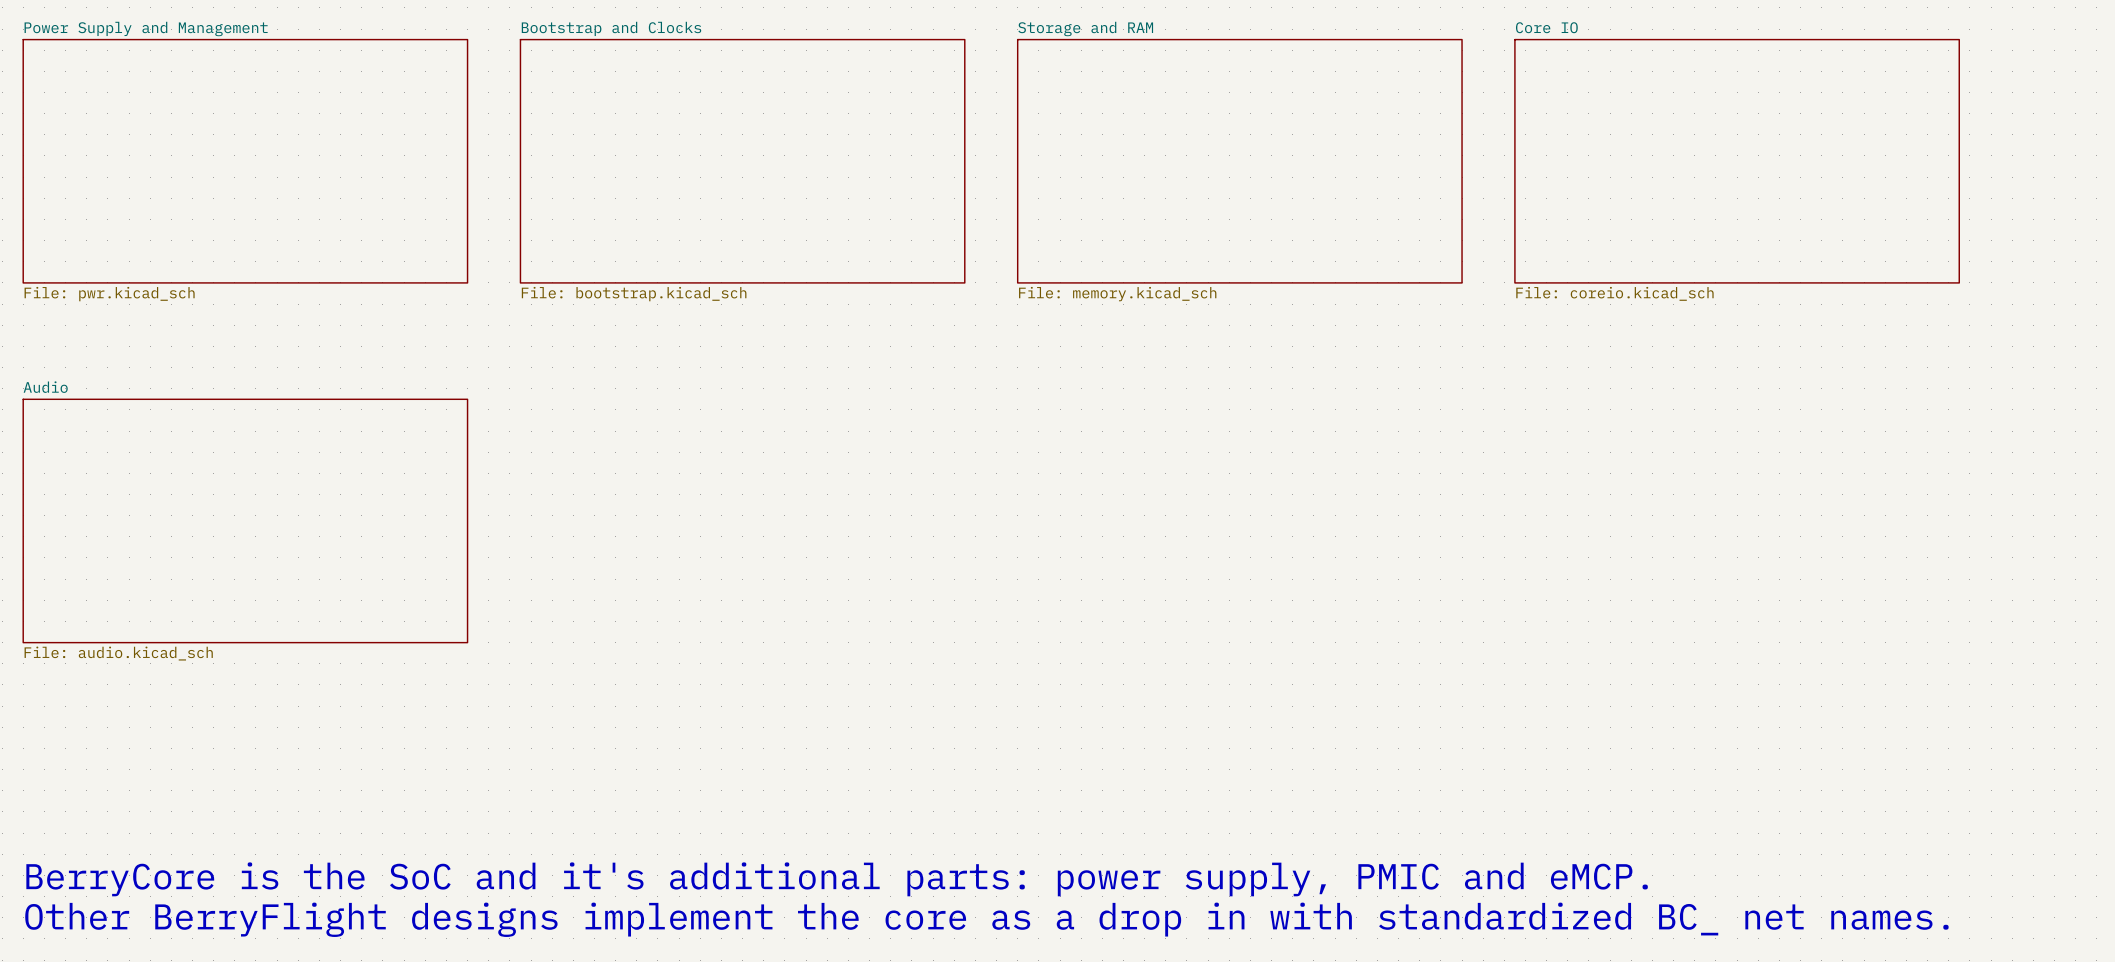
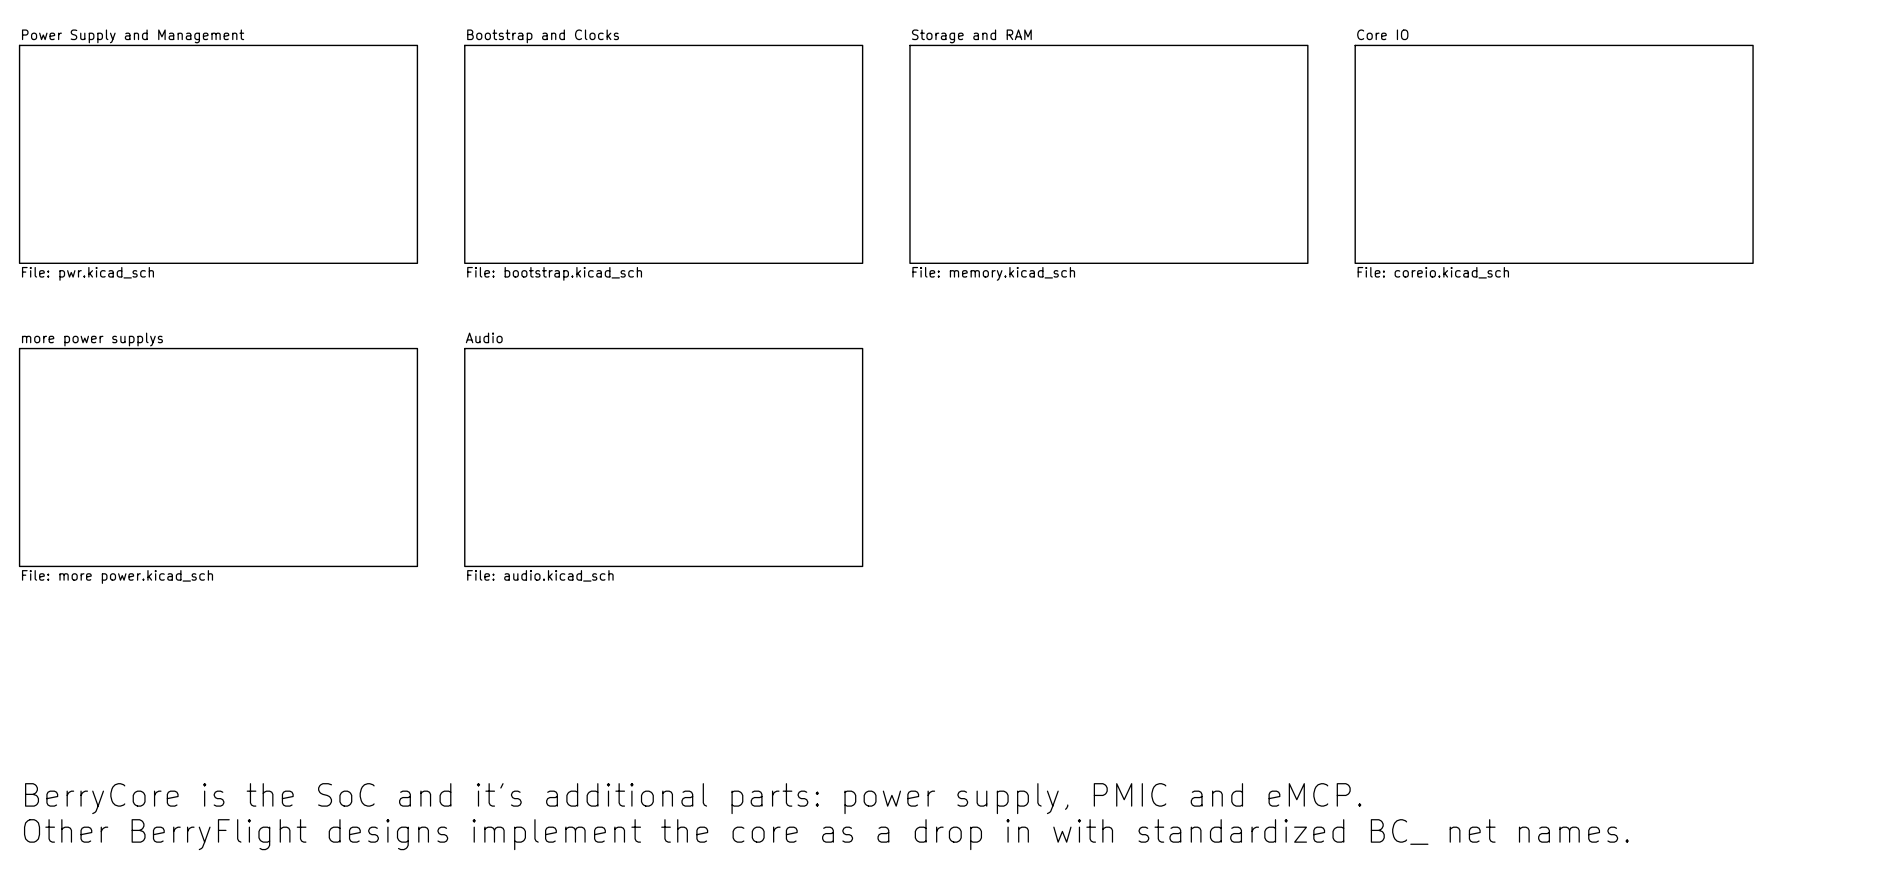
sheet more power supplys: none -> File: more power.kicad_sch (218, 457)
sheet Audio: none -> File: audio.kicad_sch (663, 457)
sheet Audio: File: audio.kicad_sch (245, 520) -> none

